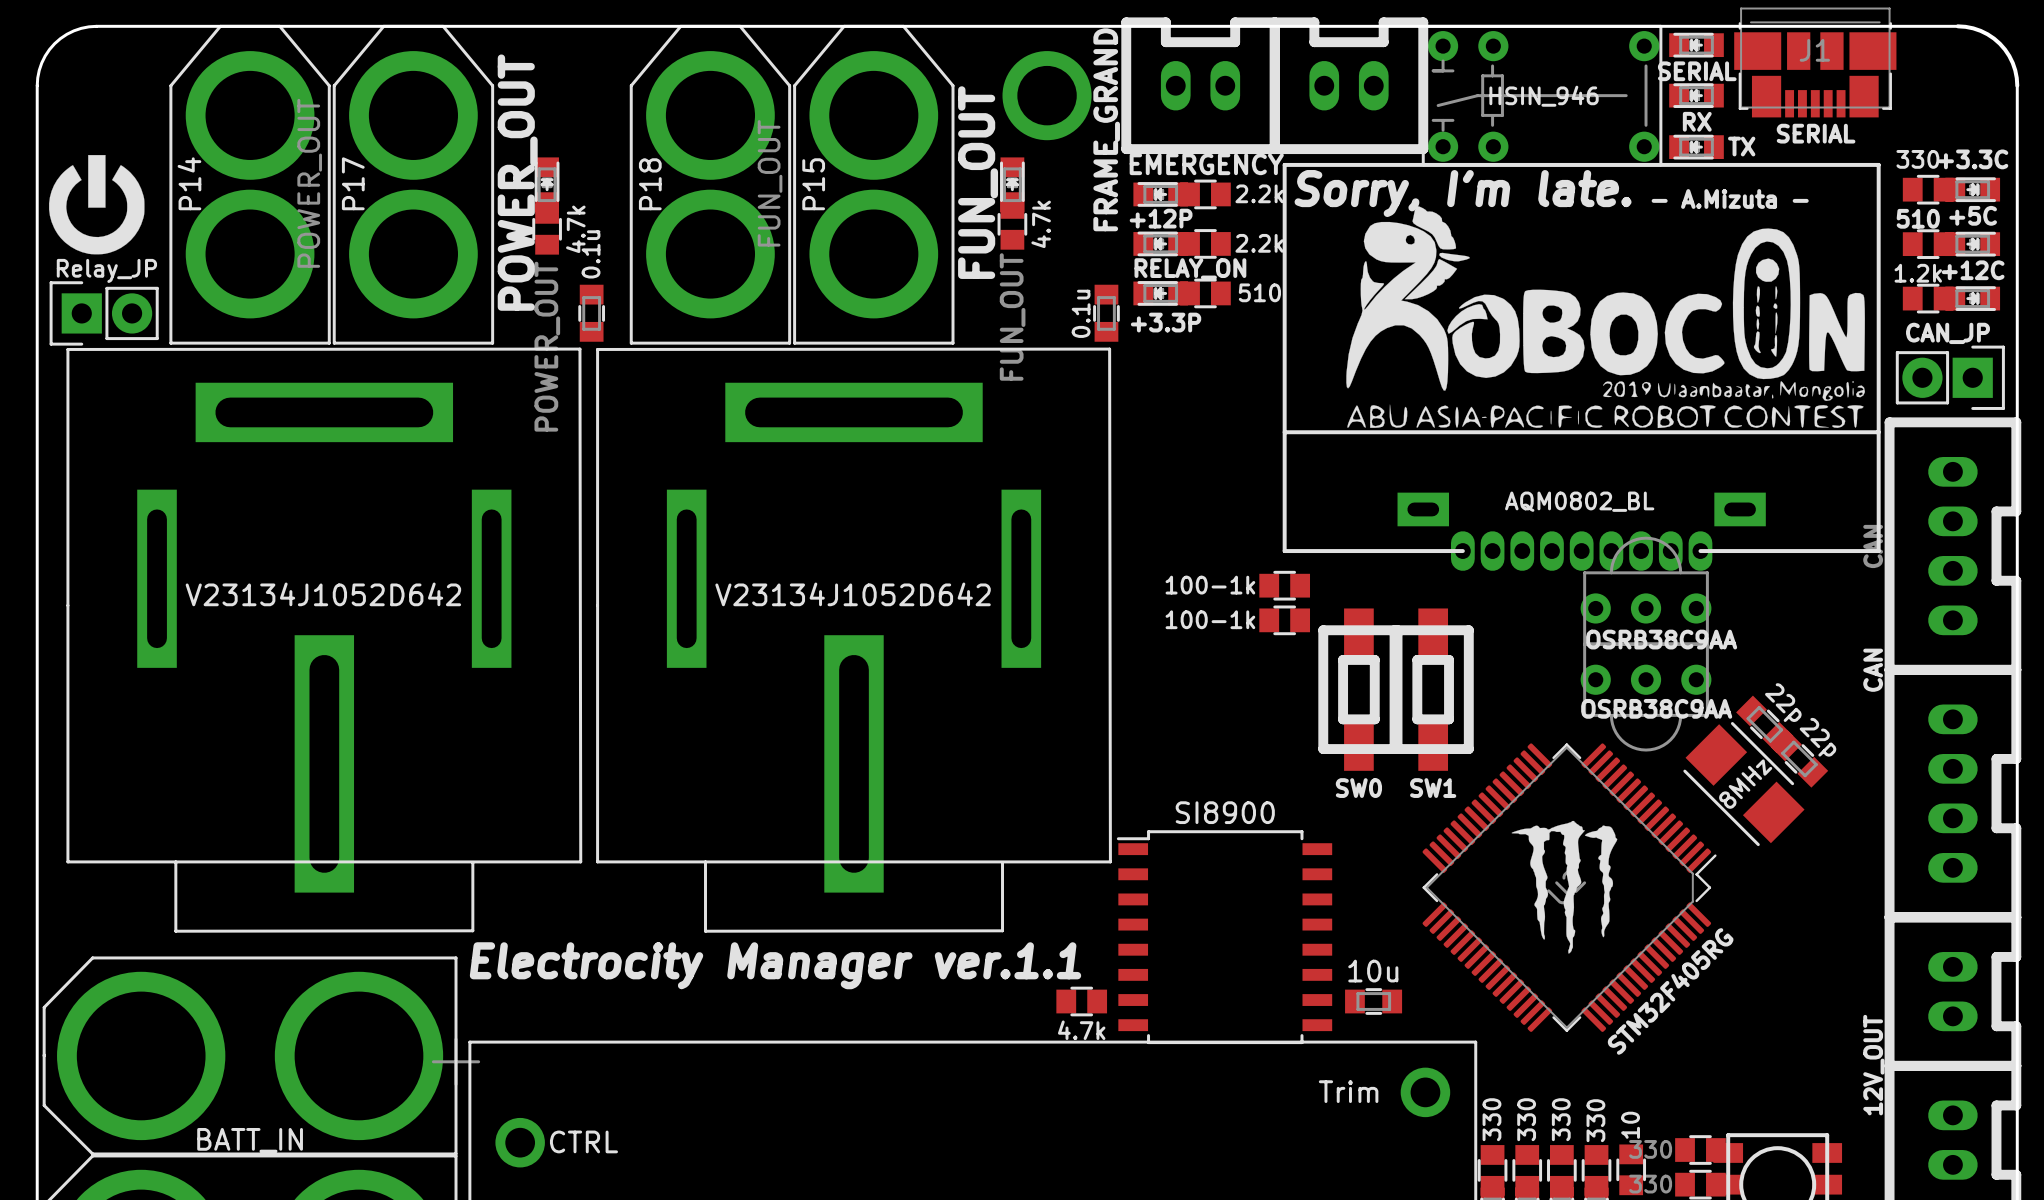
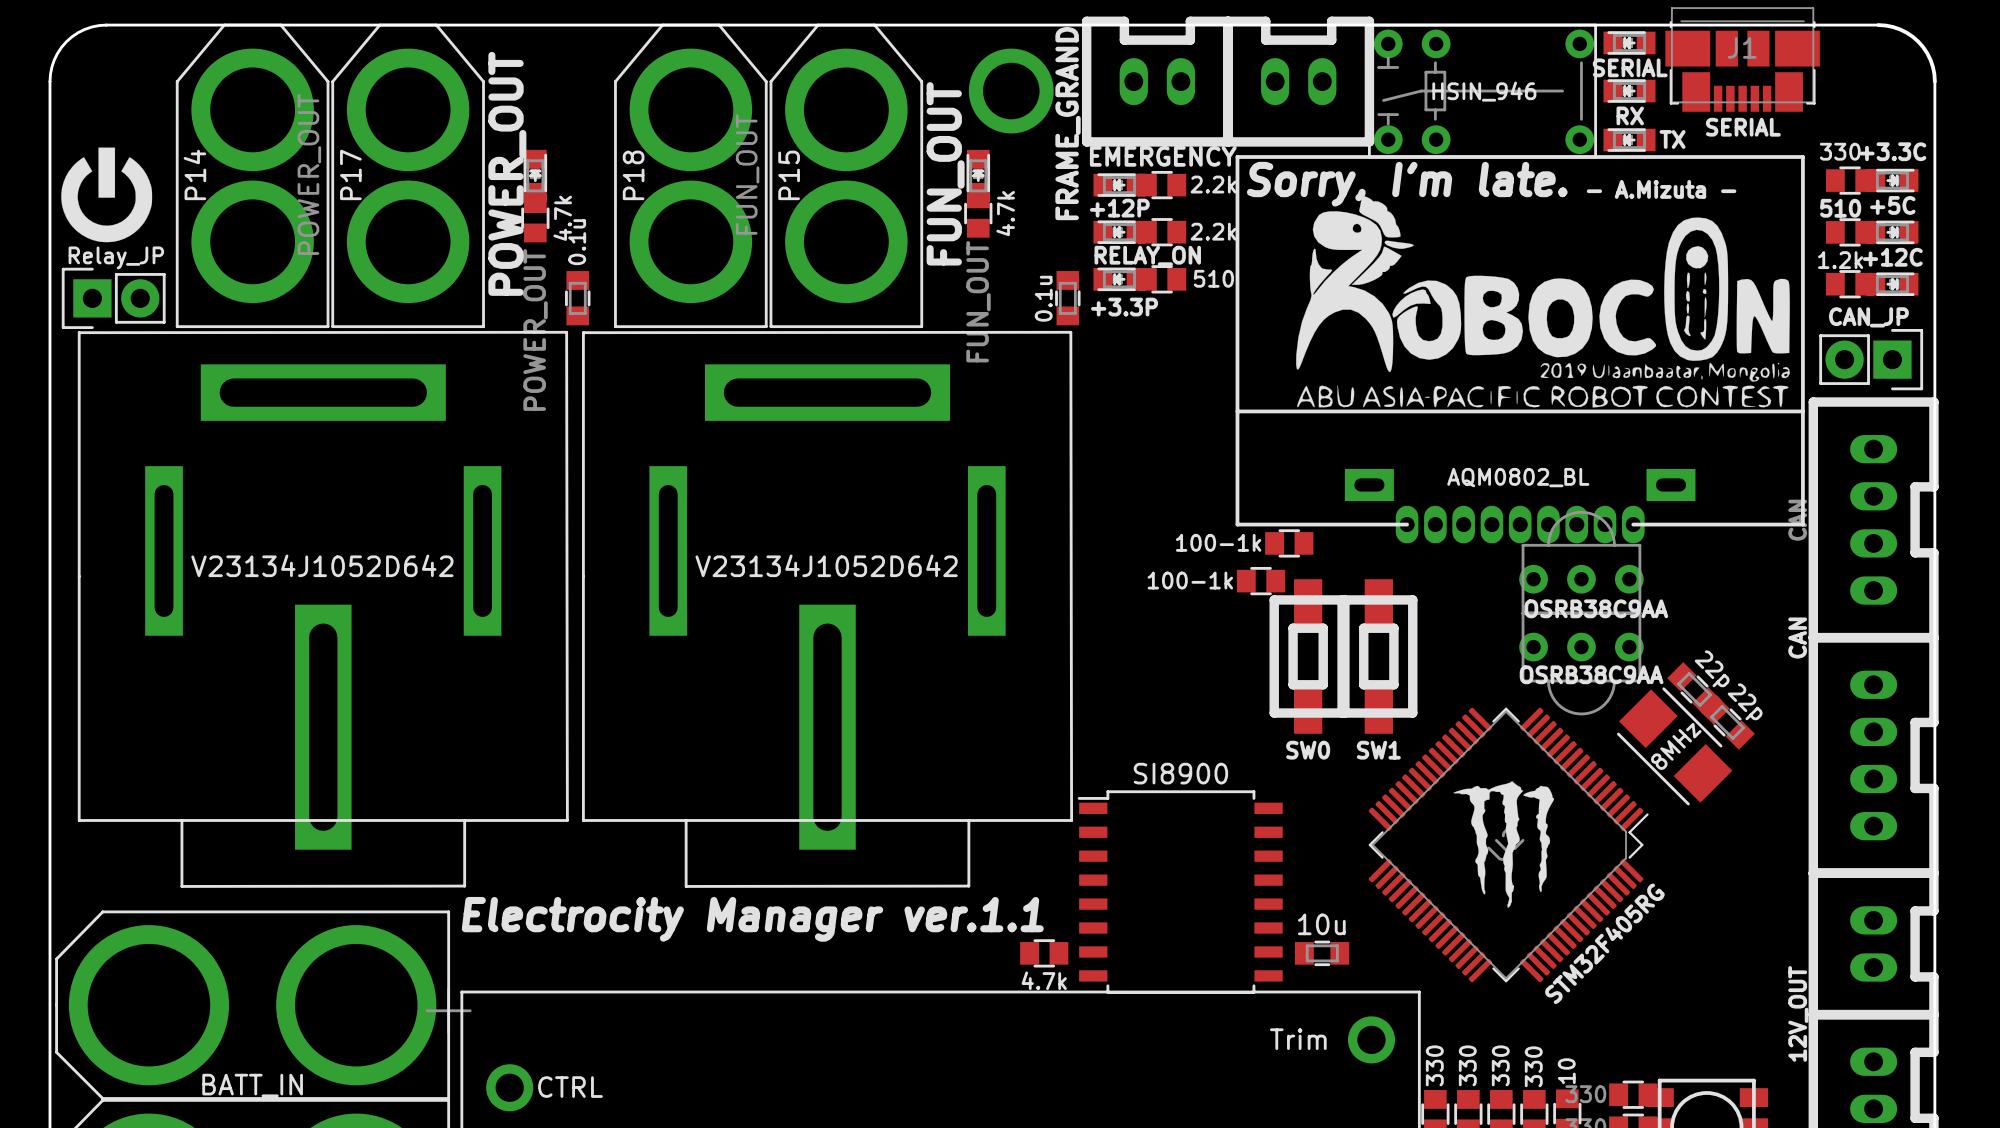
part: none -> 100-1k (1289, 543)
part: 100-1k (1284, 585) -> none
part: none -> 100-1k (1261, 581)
part: 100-1k (1284, 620) -> none

